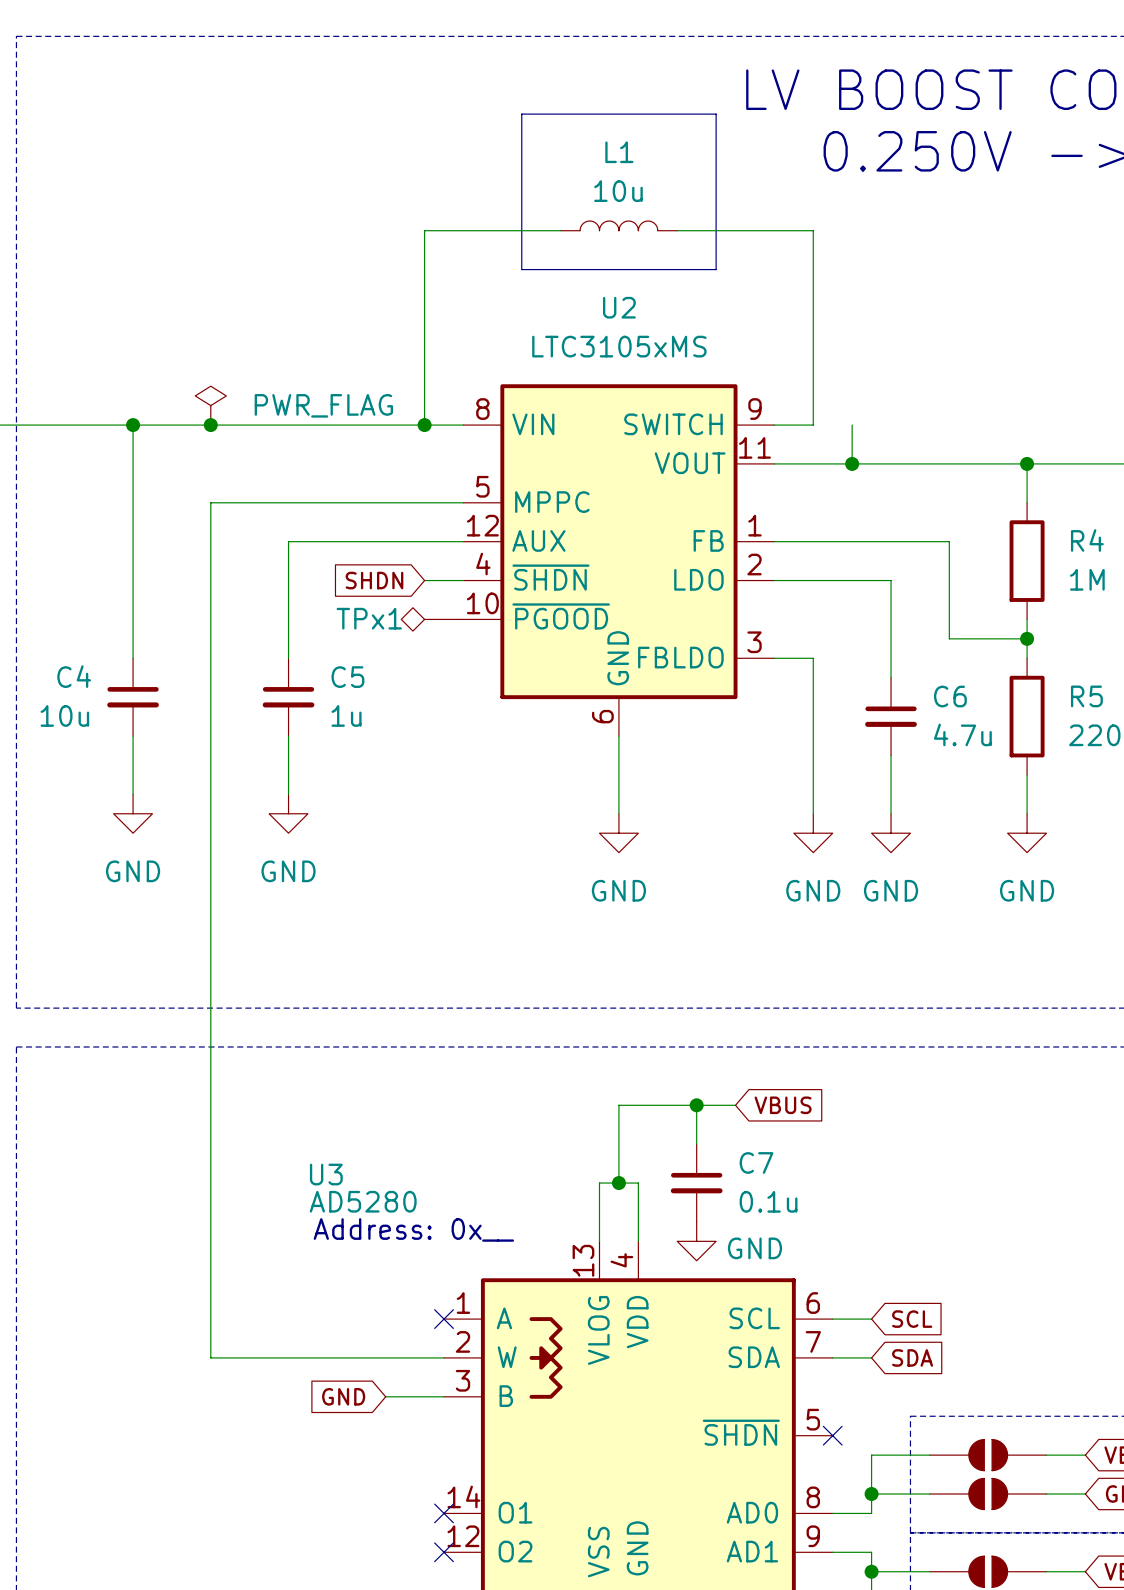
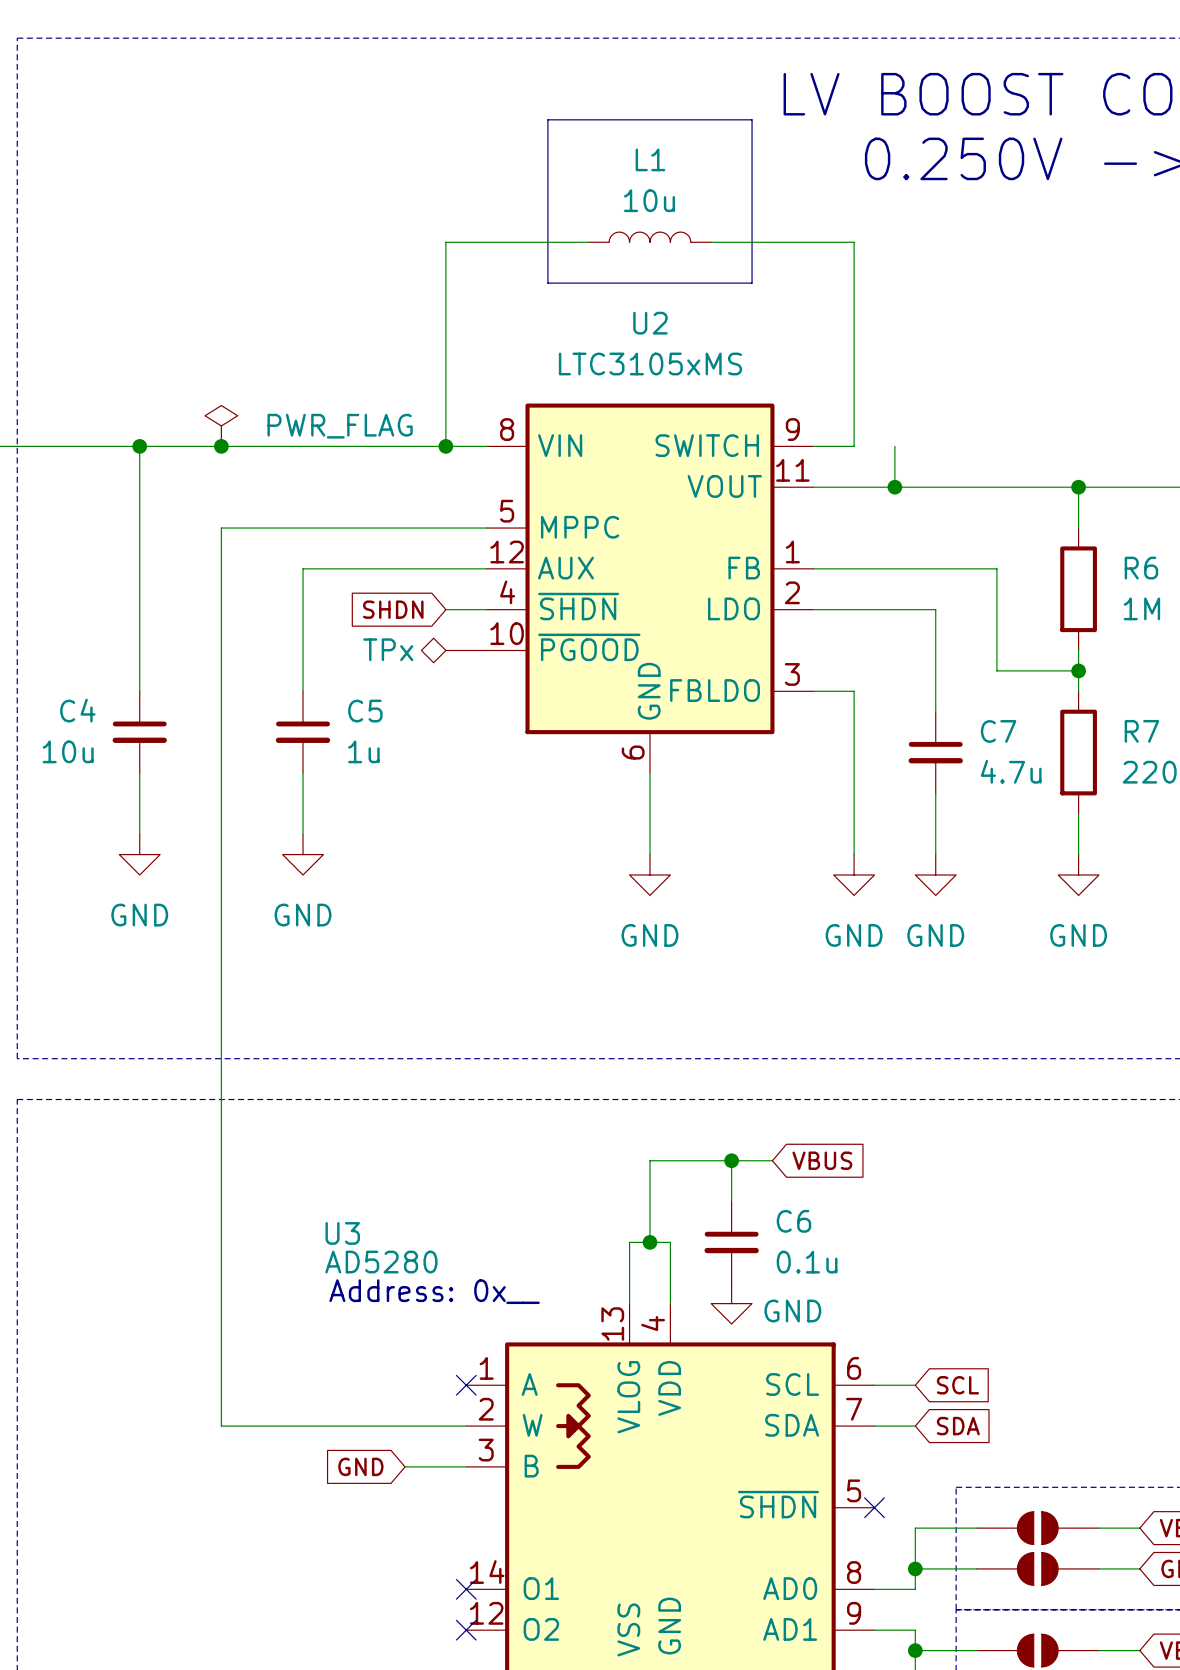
R4 name: R4 (1087, 540) -> R6 (1141, 568)
TPx1 name: TPx1 (369, 618) -> TPx (388, 649)
C6 name: C6 (950, 696) -> C7 (998, 731)
R5 name: R5 (1086, 696) -> R7 (1141, 731)
C7 name: C7 (756, 1162) -> C6 (793, 1221)

